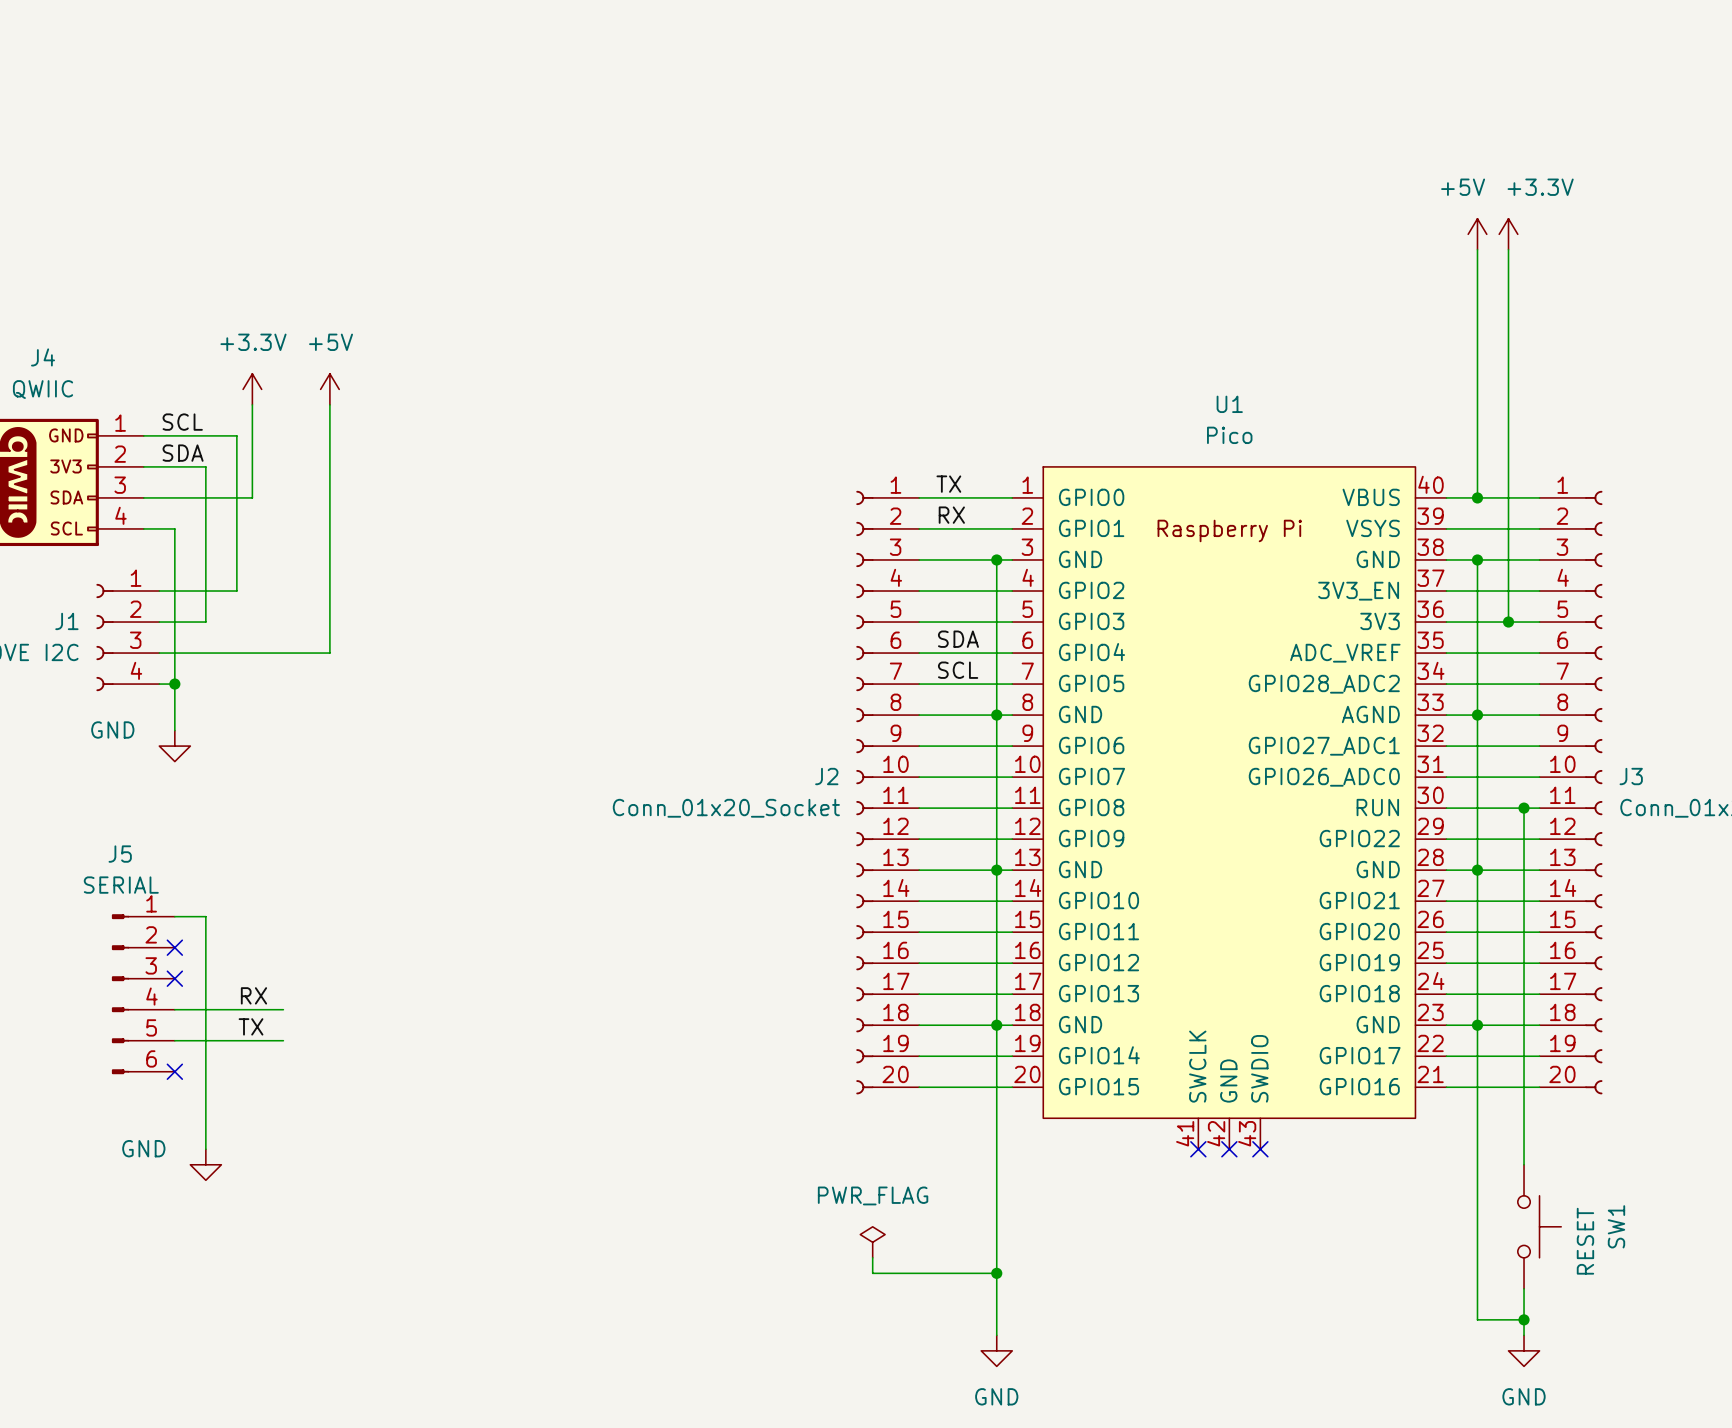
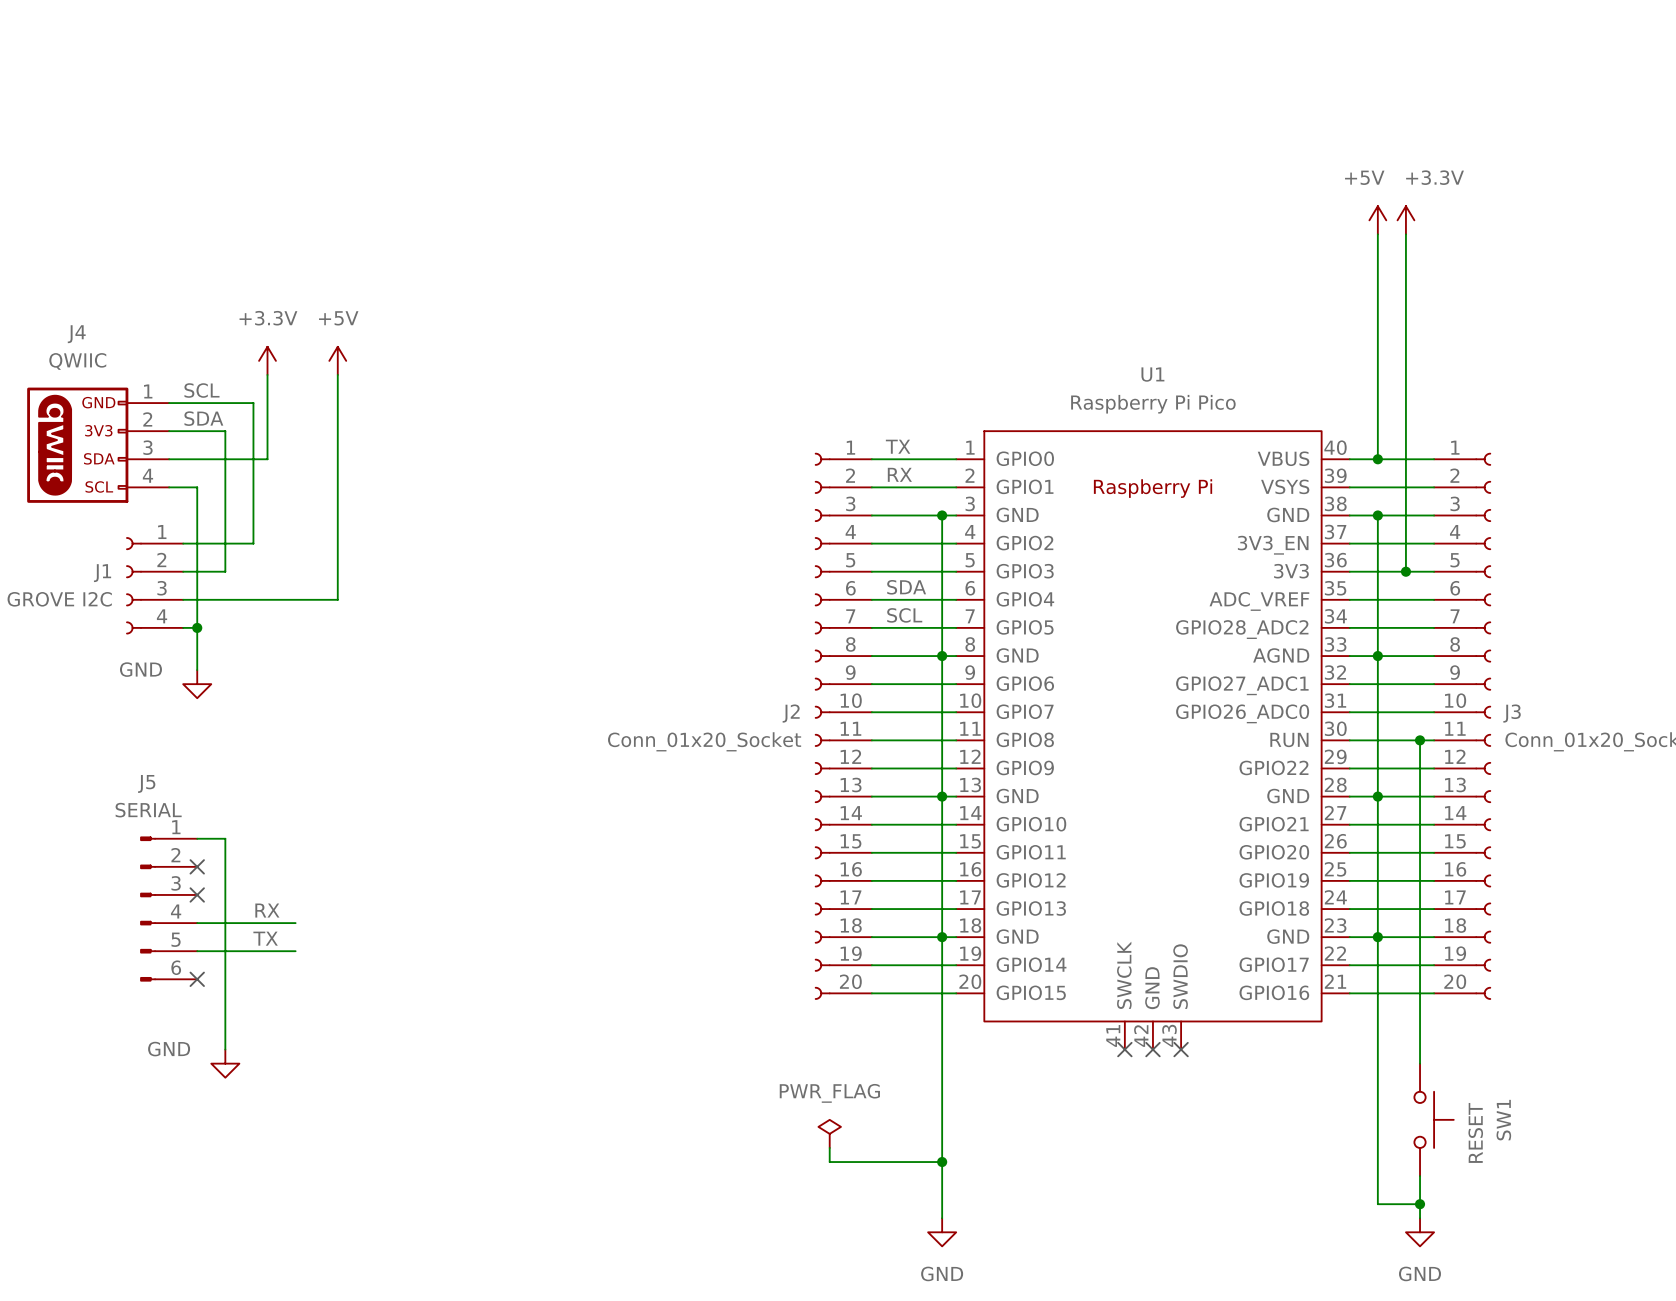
U1 value: Pico (1229, 435) -> Raspberry Pi Pico (1153, 404)

